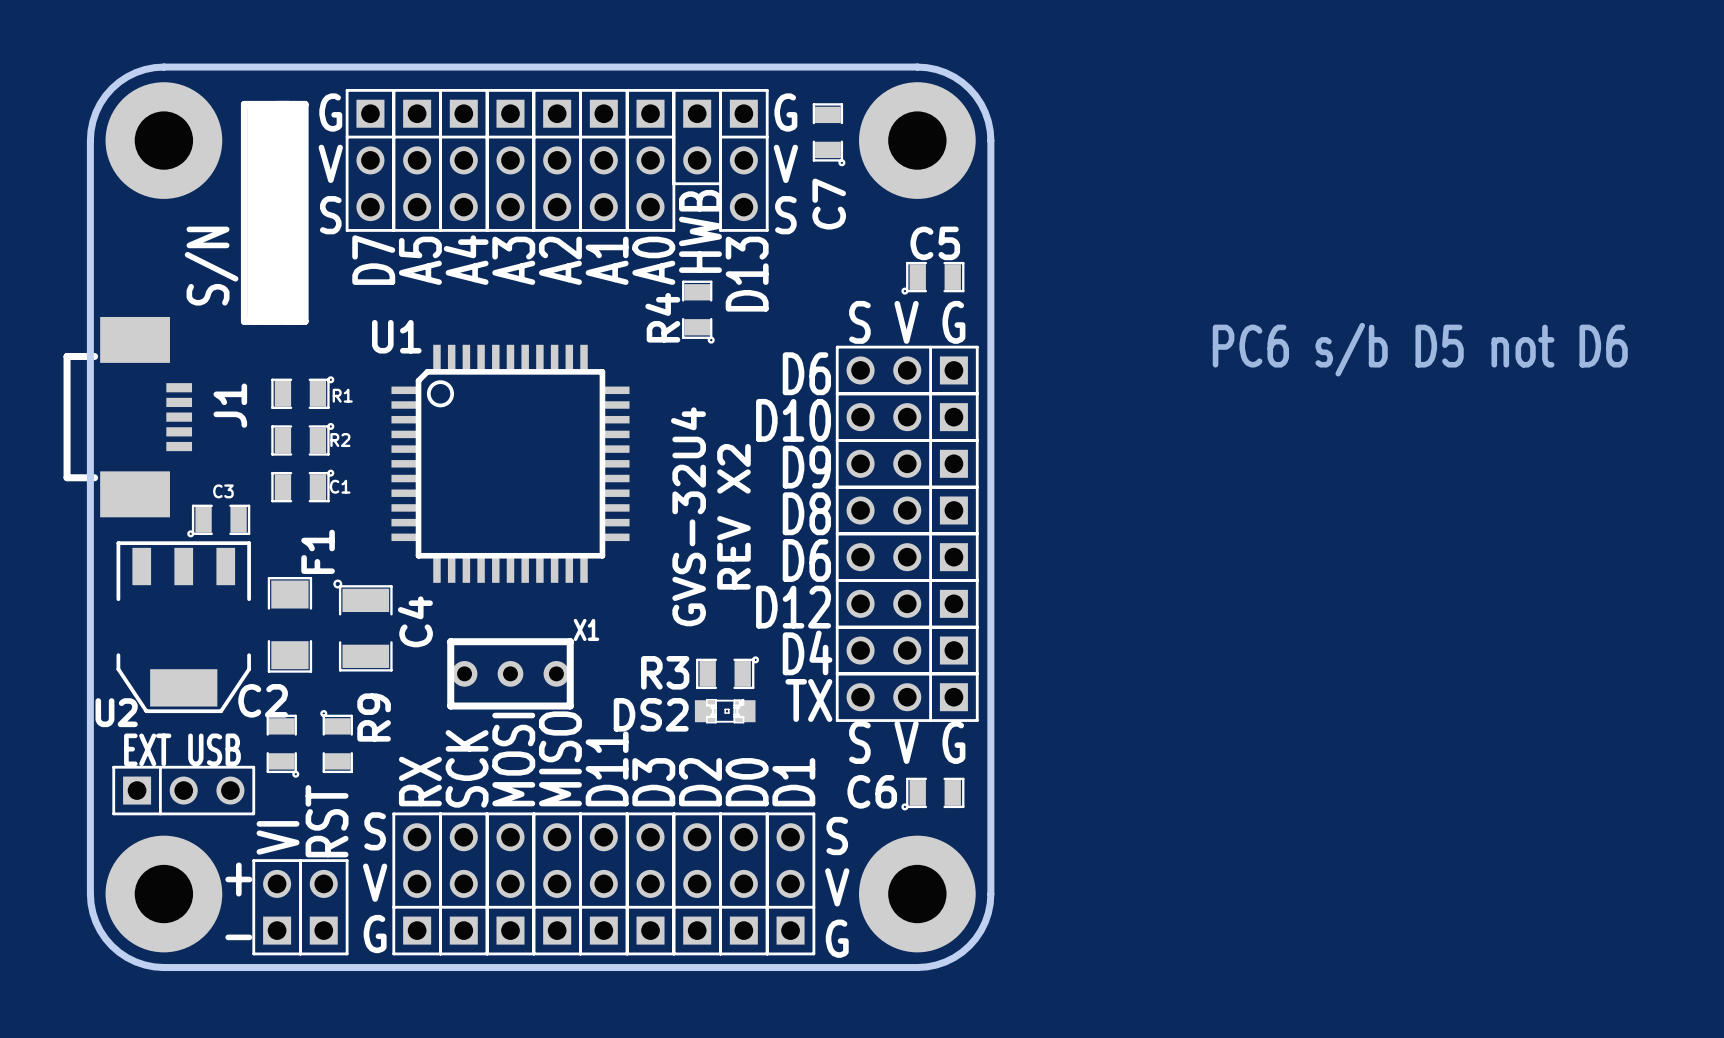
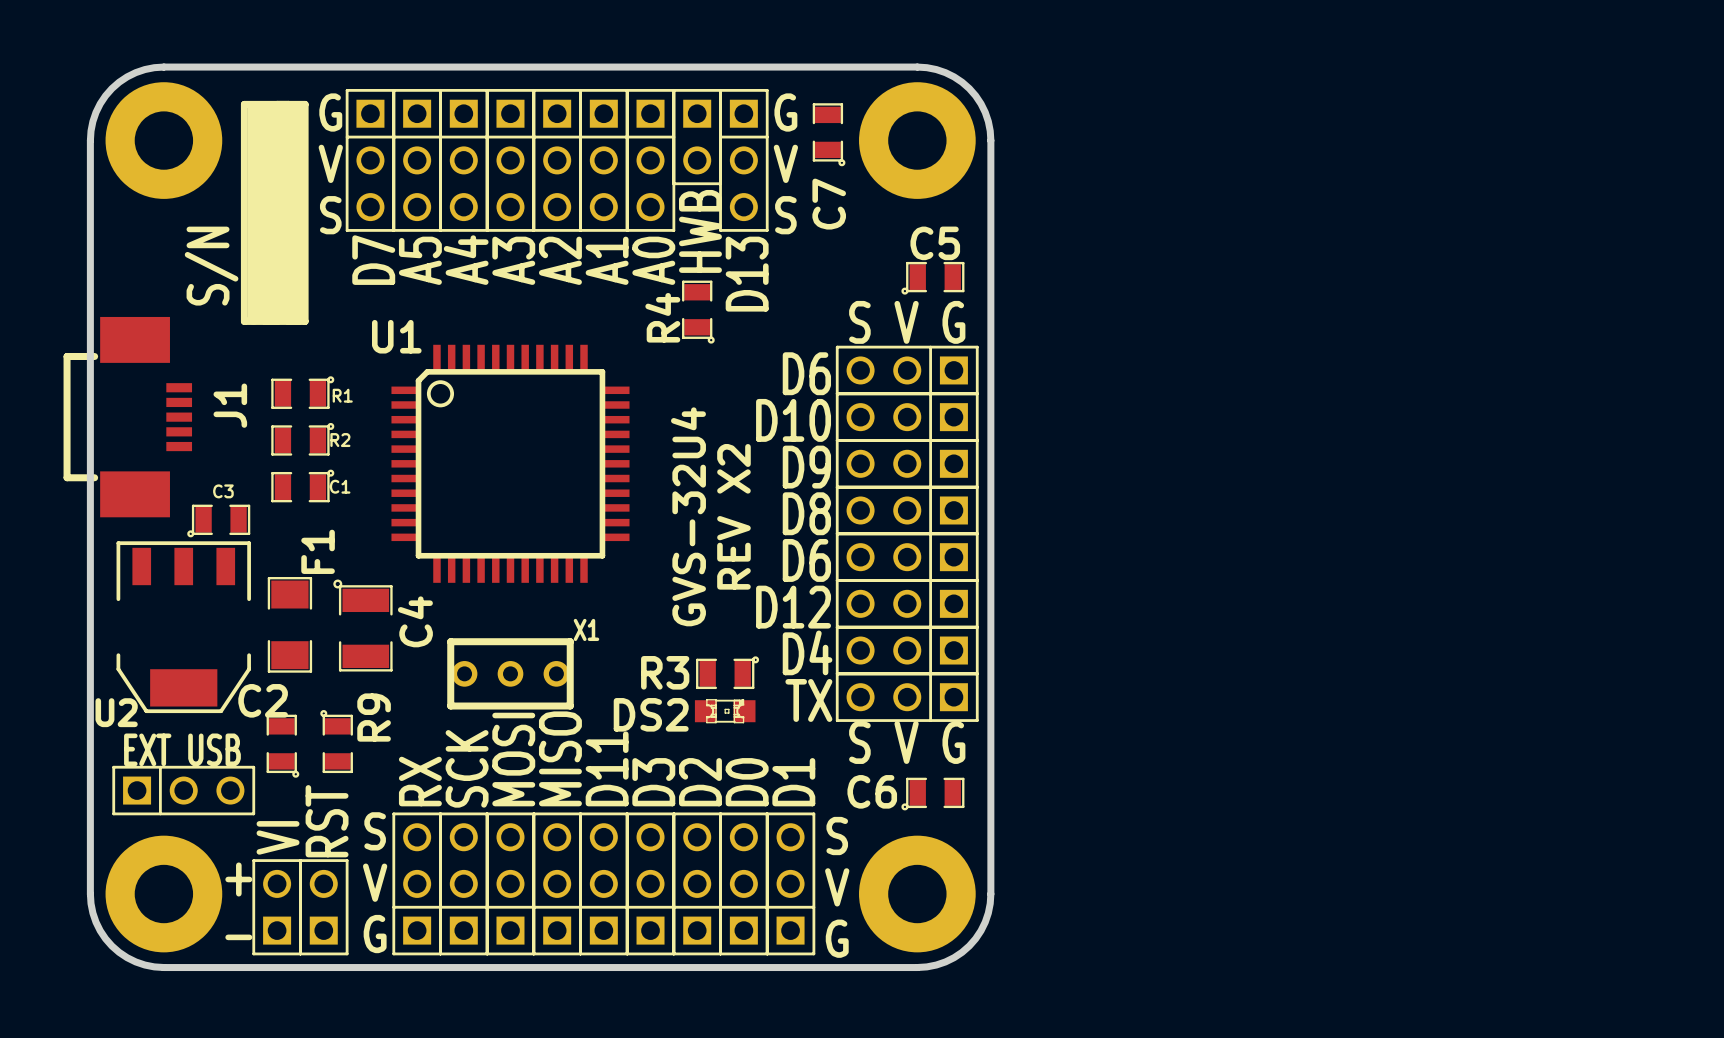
text: PC6 s/b D5 not D6 (1420, 349) -> none

